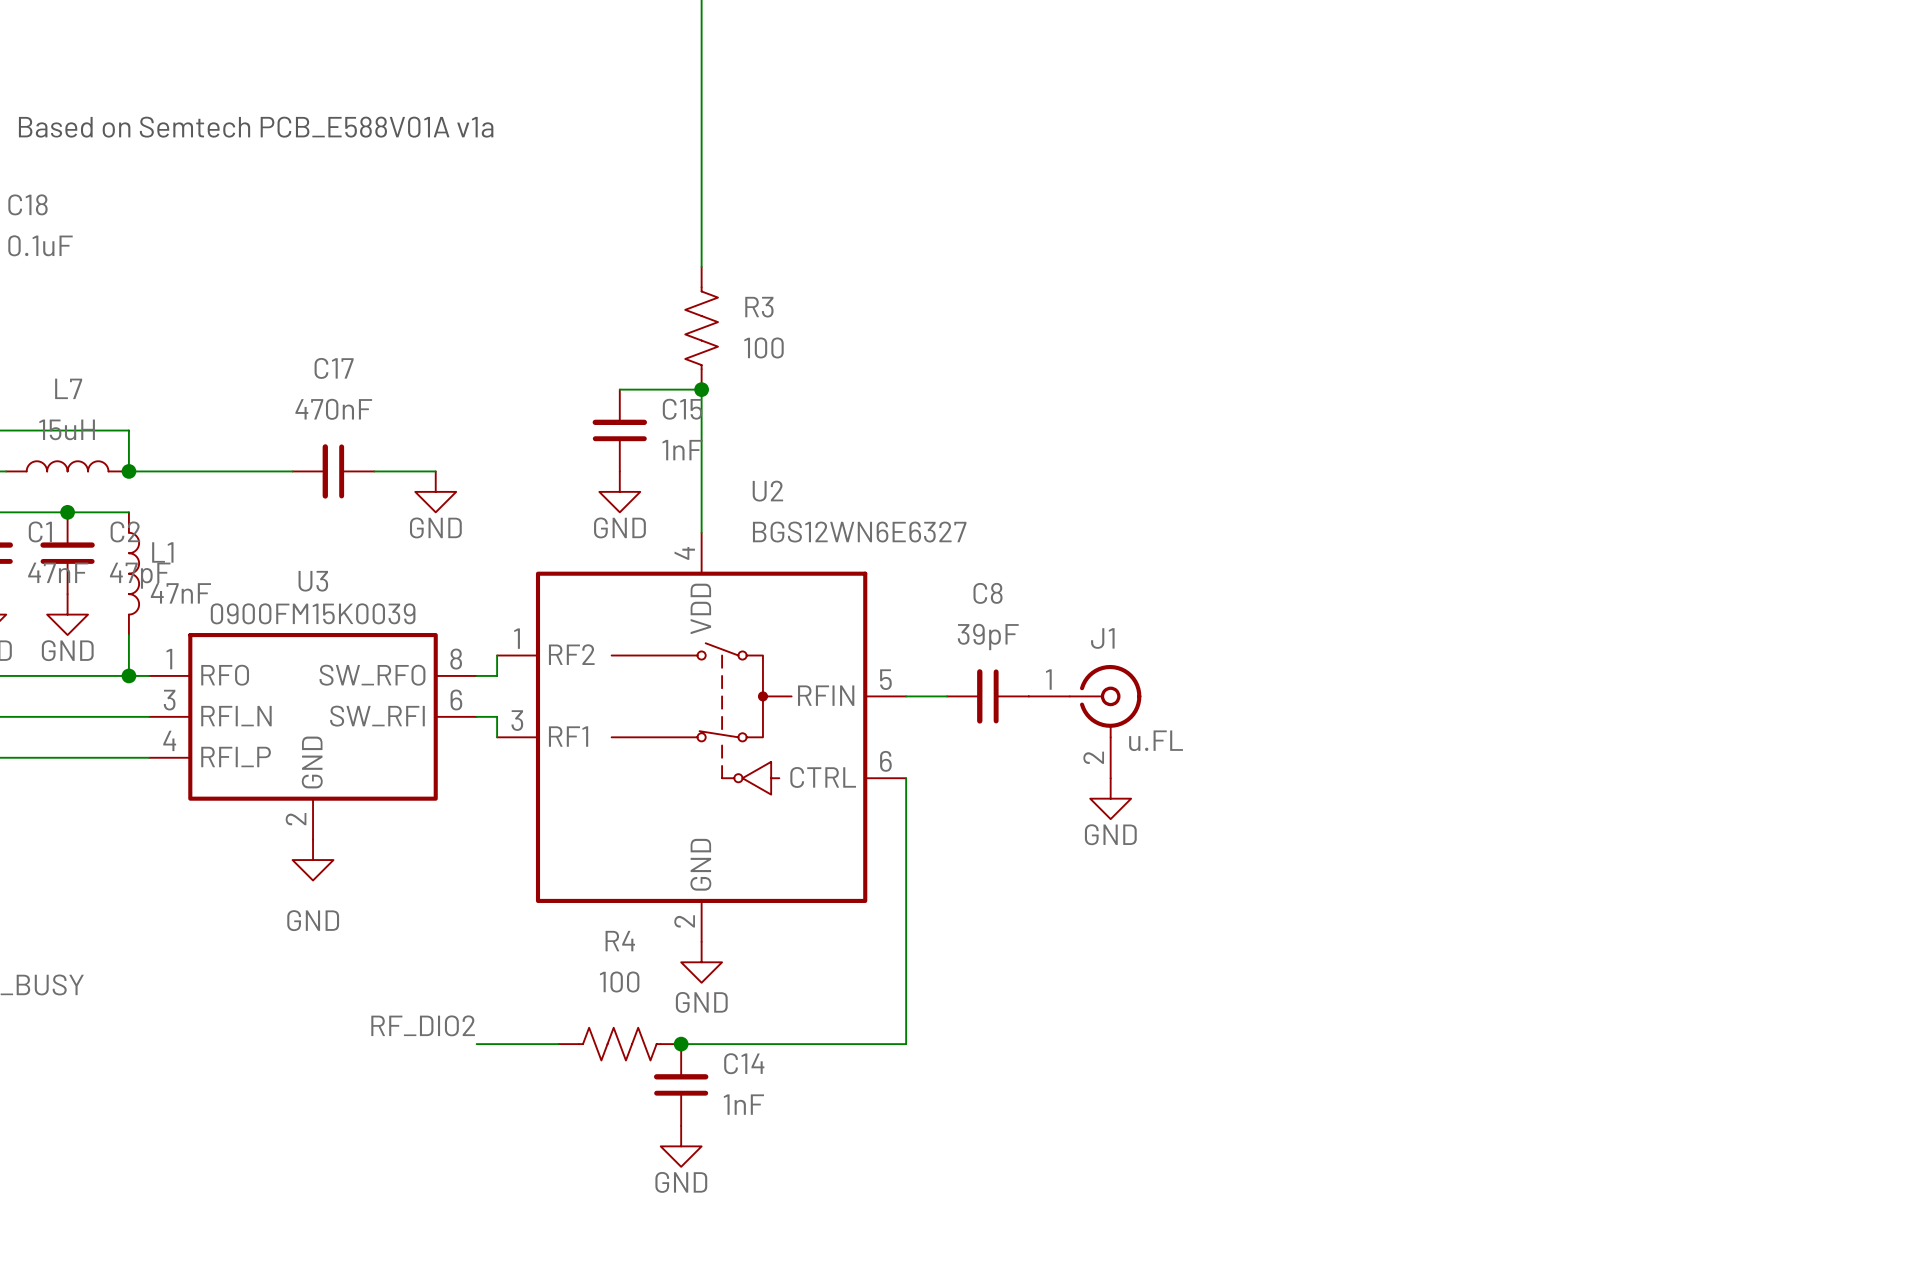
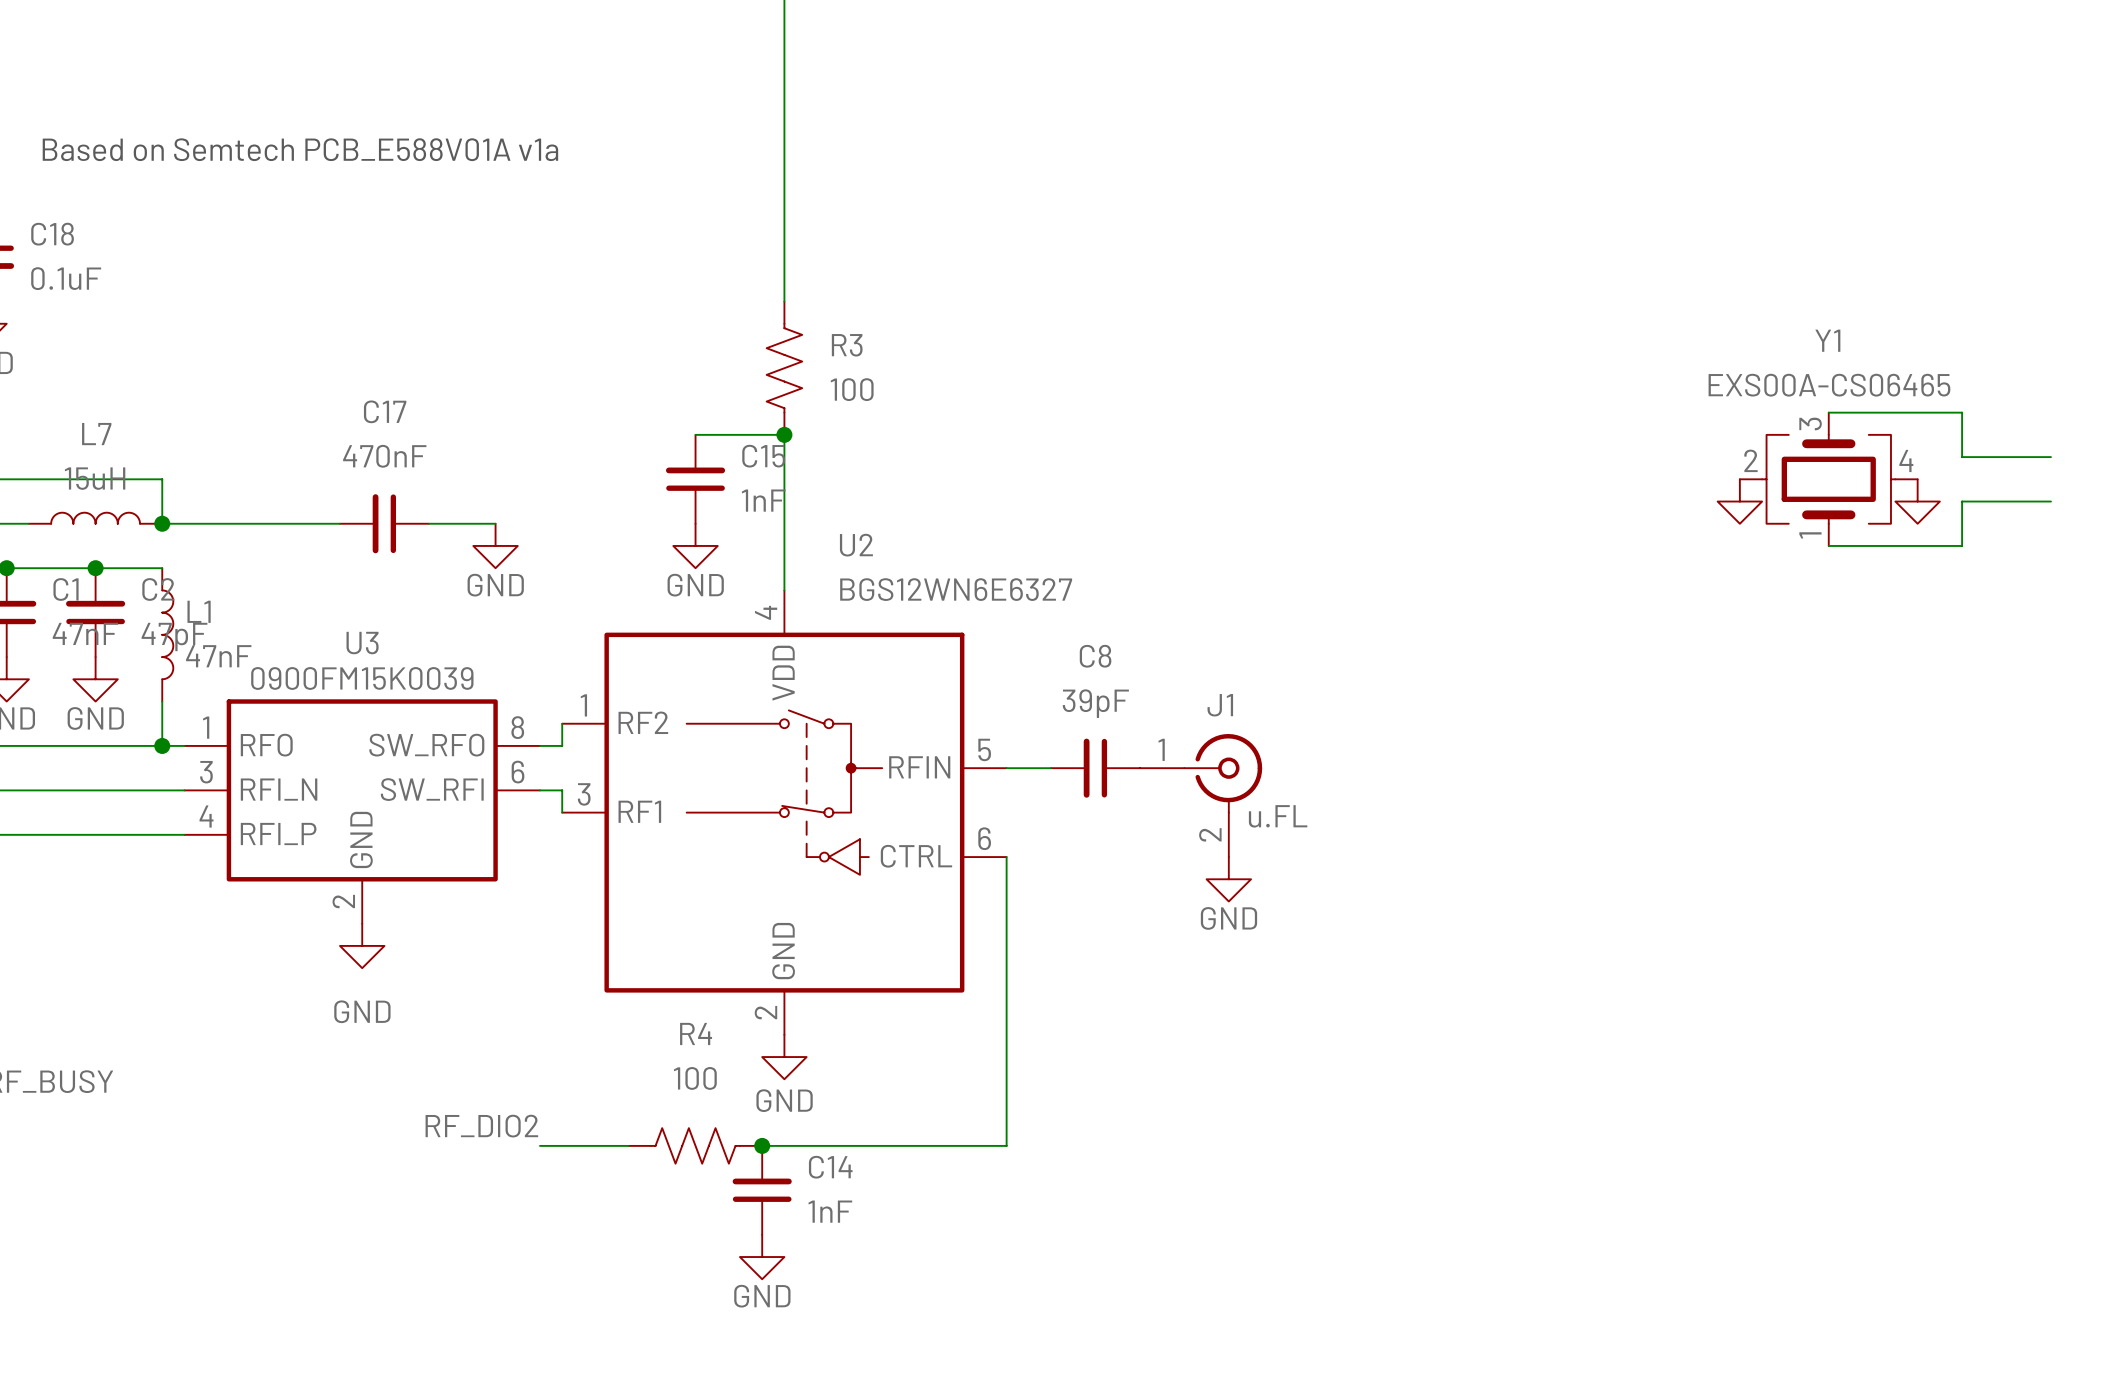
wire: none -> (1828, 412) (1962, 412) (1962, 457) (2050, 457)
Y1: none -> EXS00A-CS06465 (1828, 479)
power symbol: none -> (1739, 501)
power symbol: none -> (1917, 501)
wire: none -> (2050, 501) (1962, 501) (1962, 545) (1828, 545)

